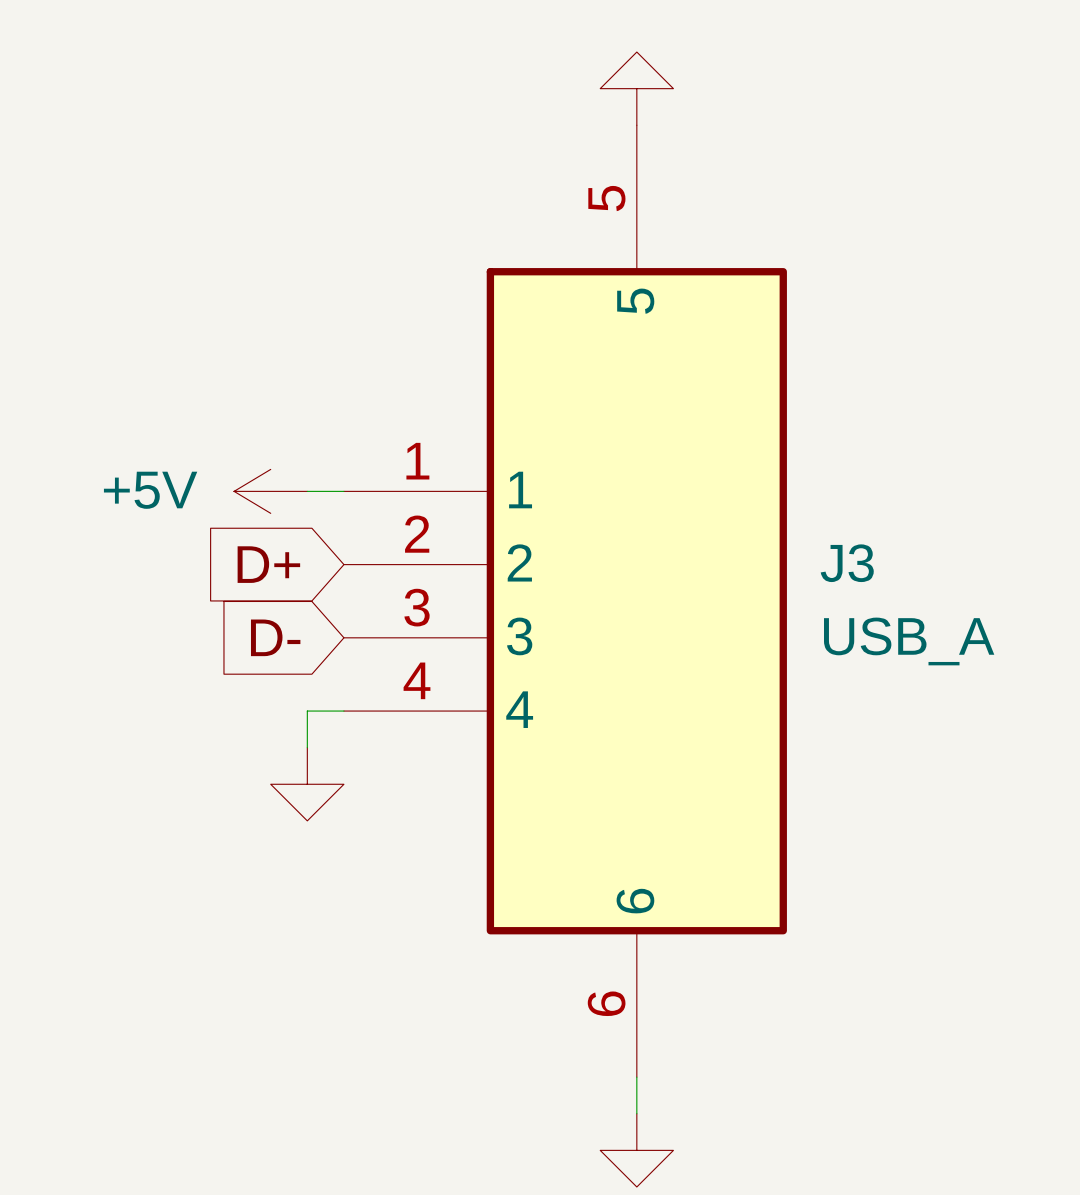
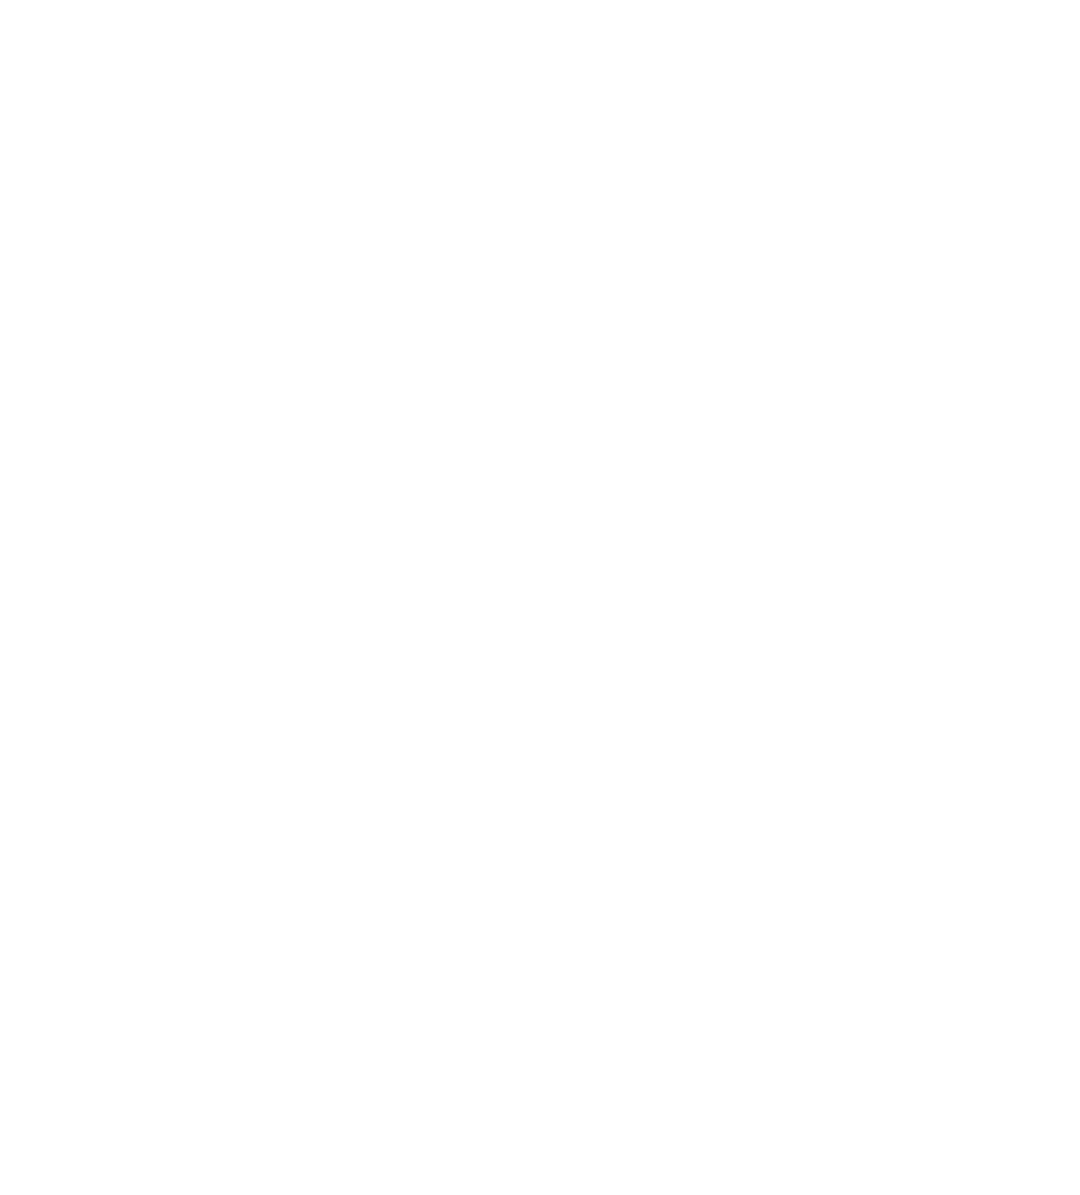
power symbol: (636, 88) -> none
power symbol: +5V (270, 491) -> none
wire: (307, 491) (343, 491) -> none
global label: D+ (268, 564) -> none
J3: USB_A (565, 601) -> none
global label: D- (275, 637) -> none
wire: (343, 711) (307, 711) (307, 747) -> none
power symbol: (307, 784) -> none
wire: (636, 1077) (636, 1113) -> none
power symbol: (636, 1150) -> none

